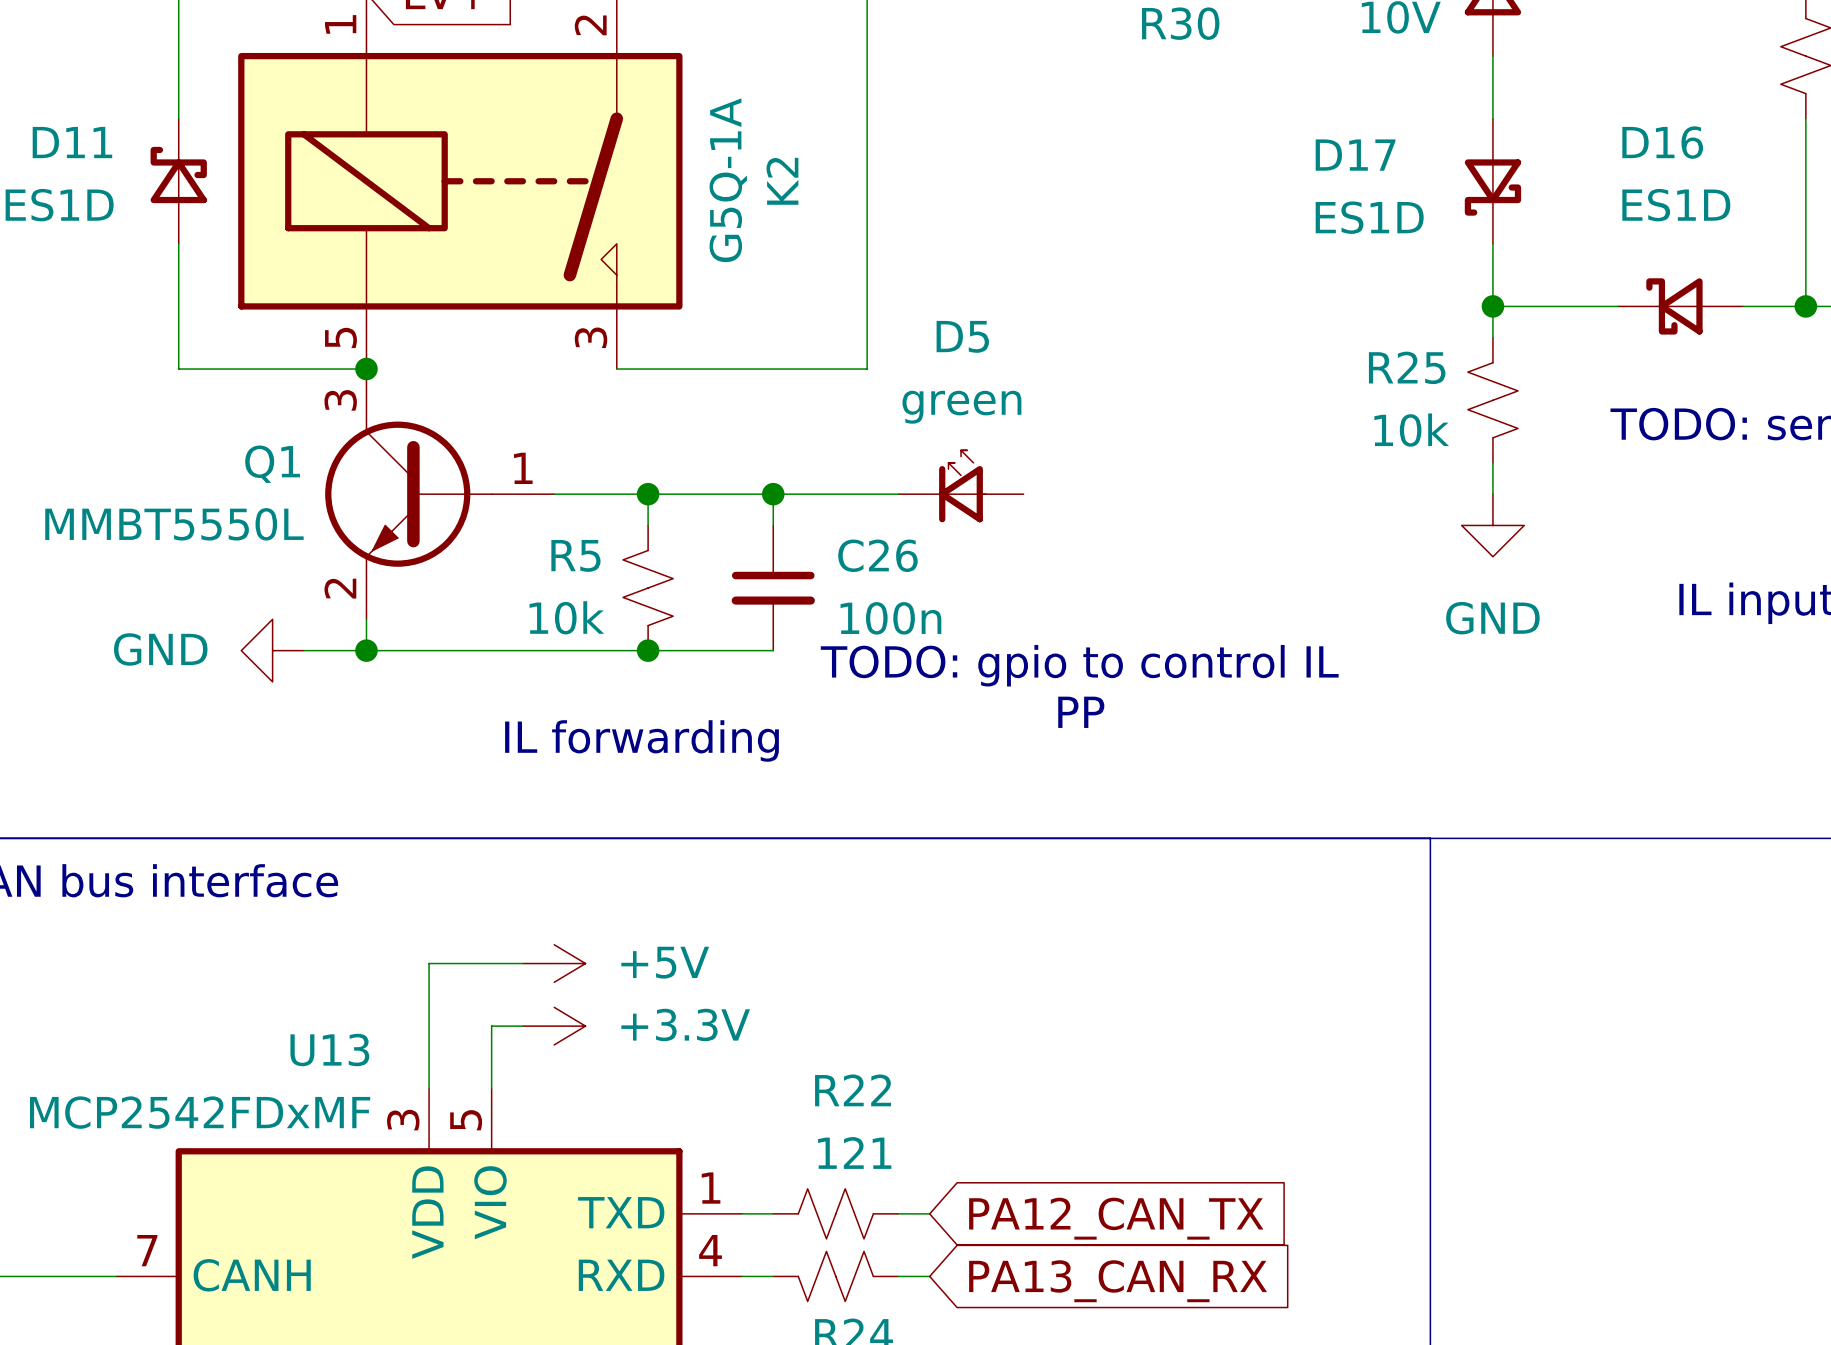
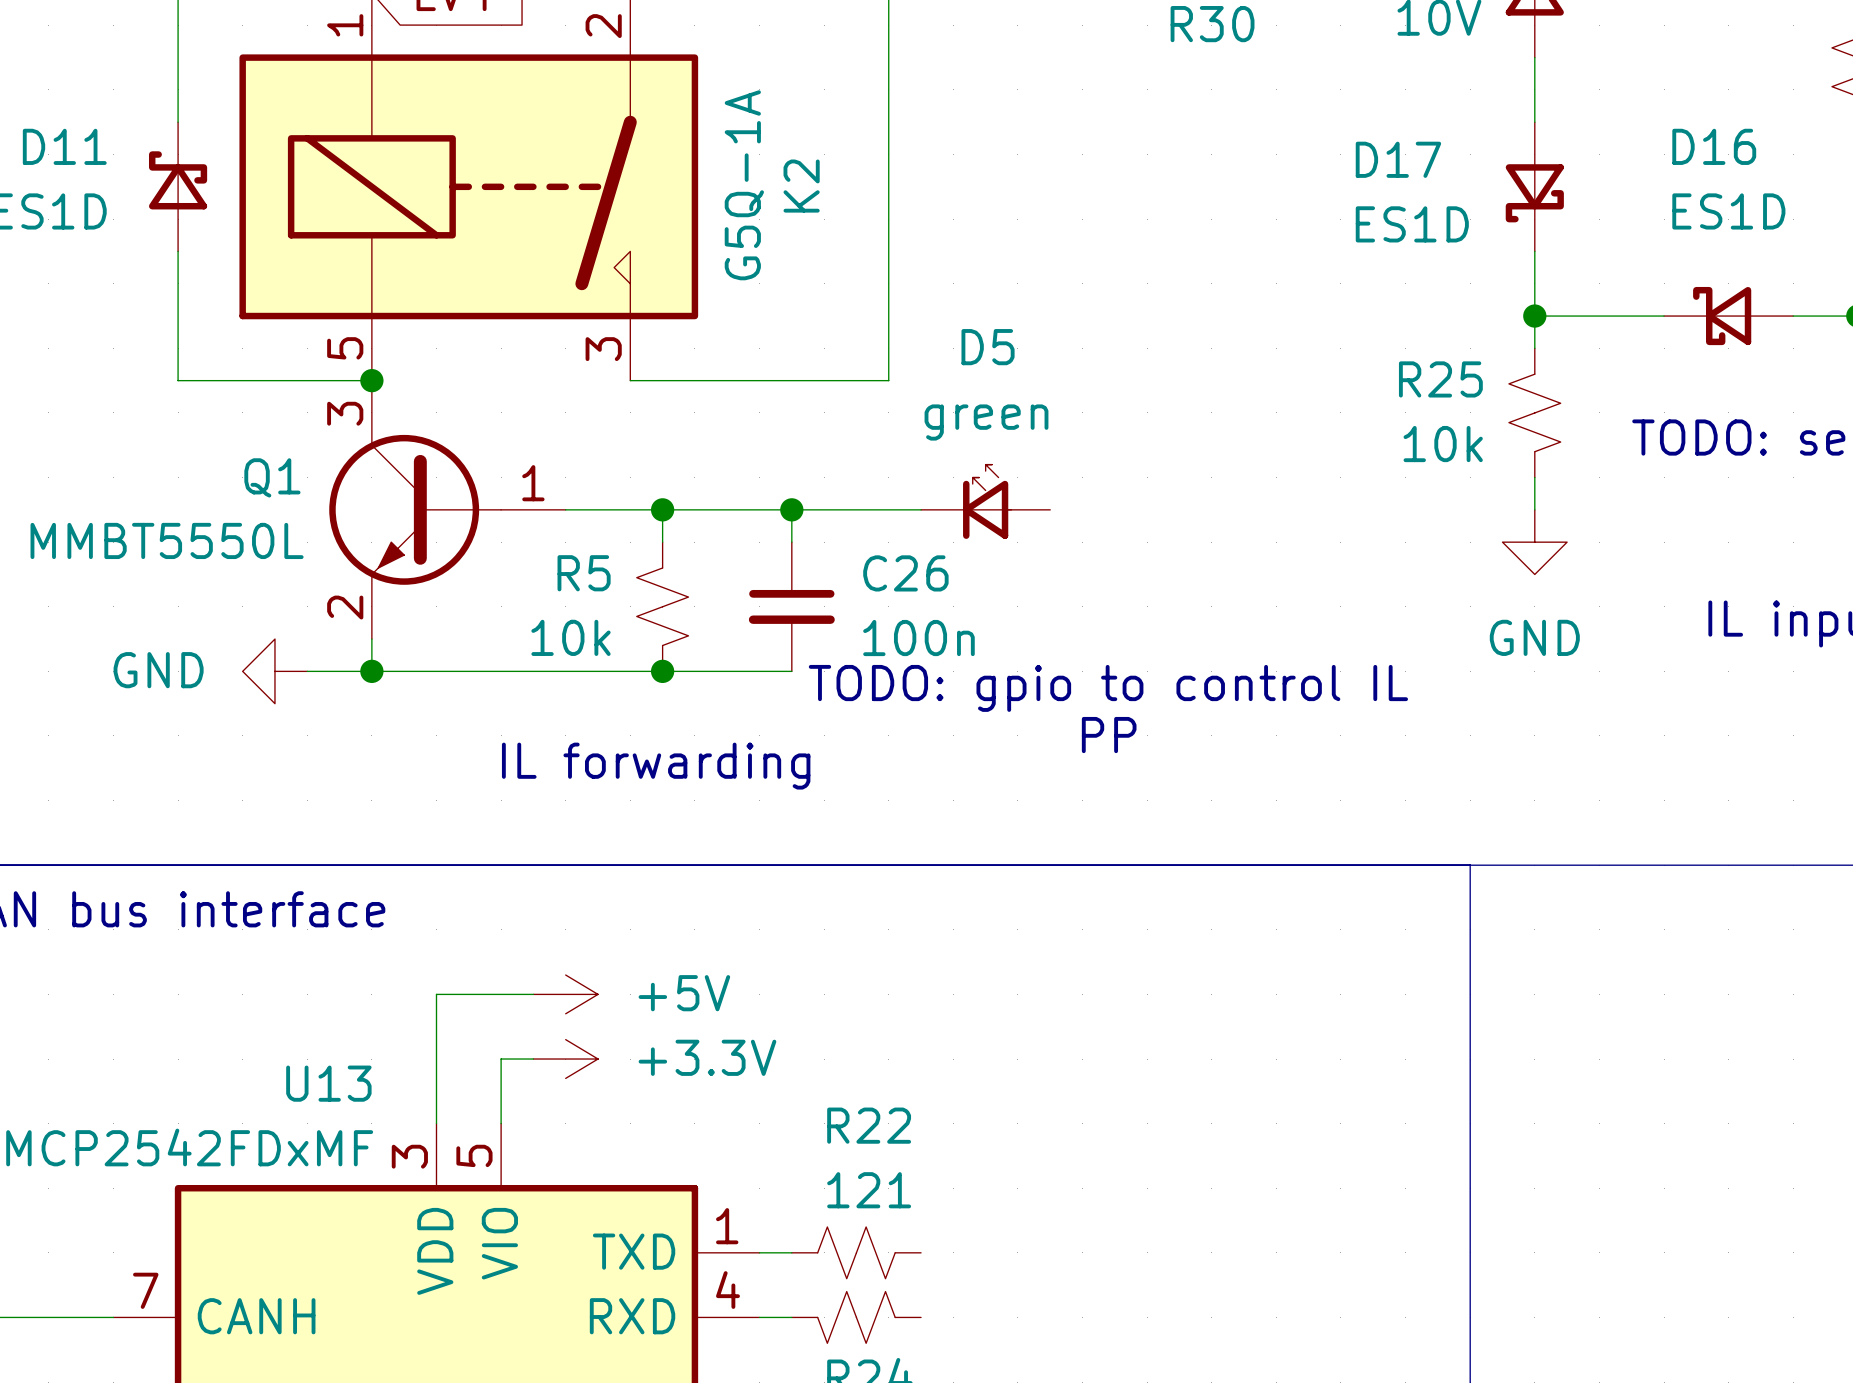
wire: (898, 1213) (929, 1213) -> none
global label: PA12_CAN_TX (1116, 1218) -> none
wire: (898, 1276) (929, 1276) -> none
global label: PA13_CAN_RX (1118, 1281) -> none

